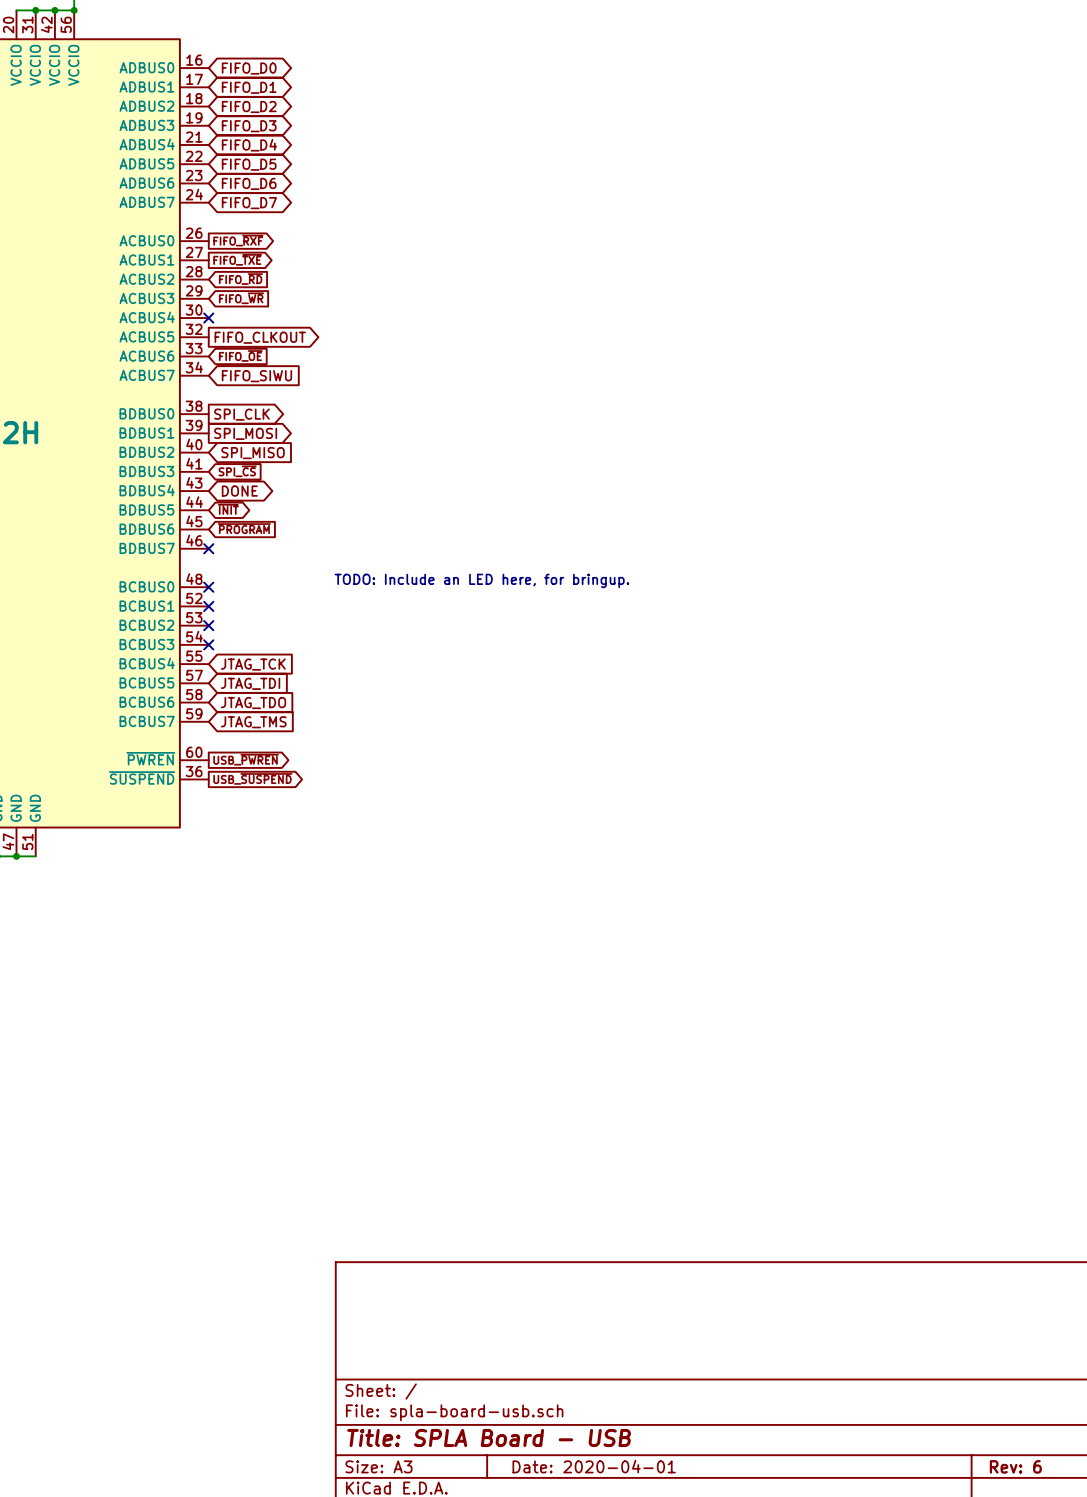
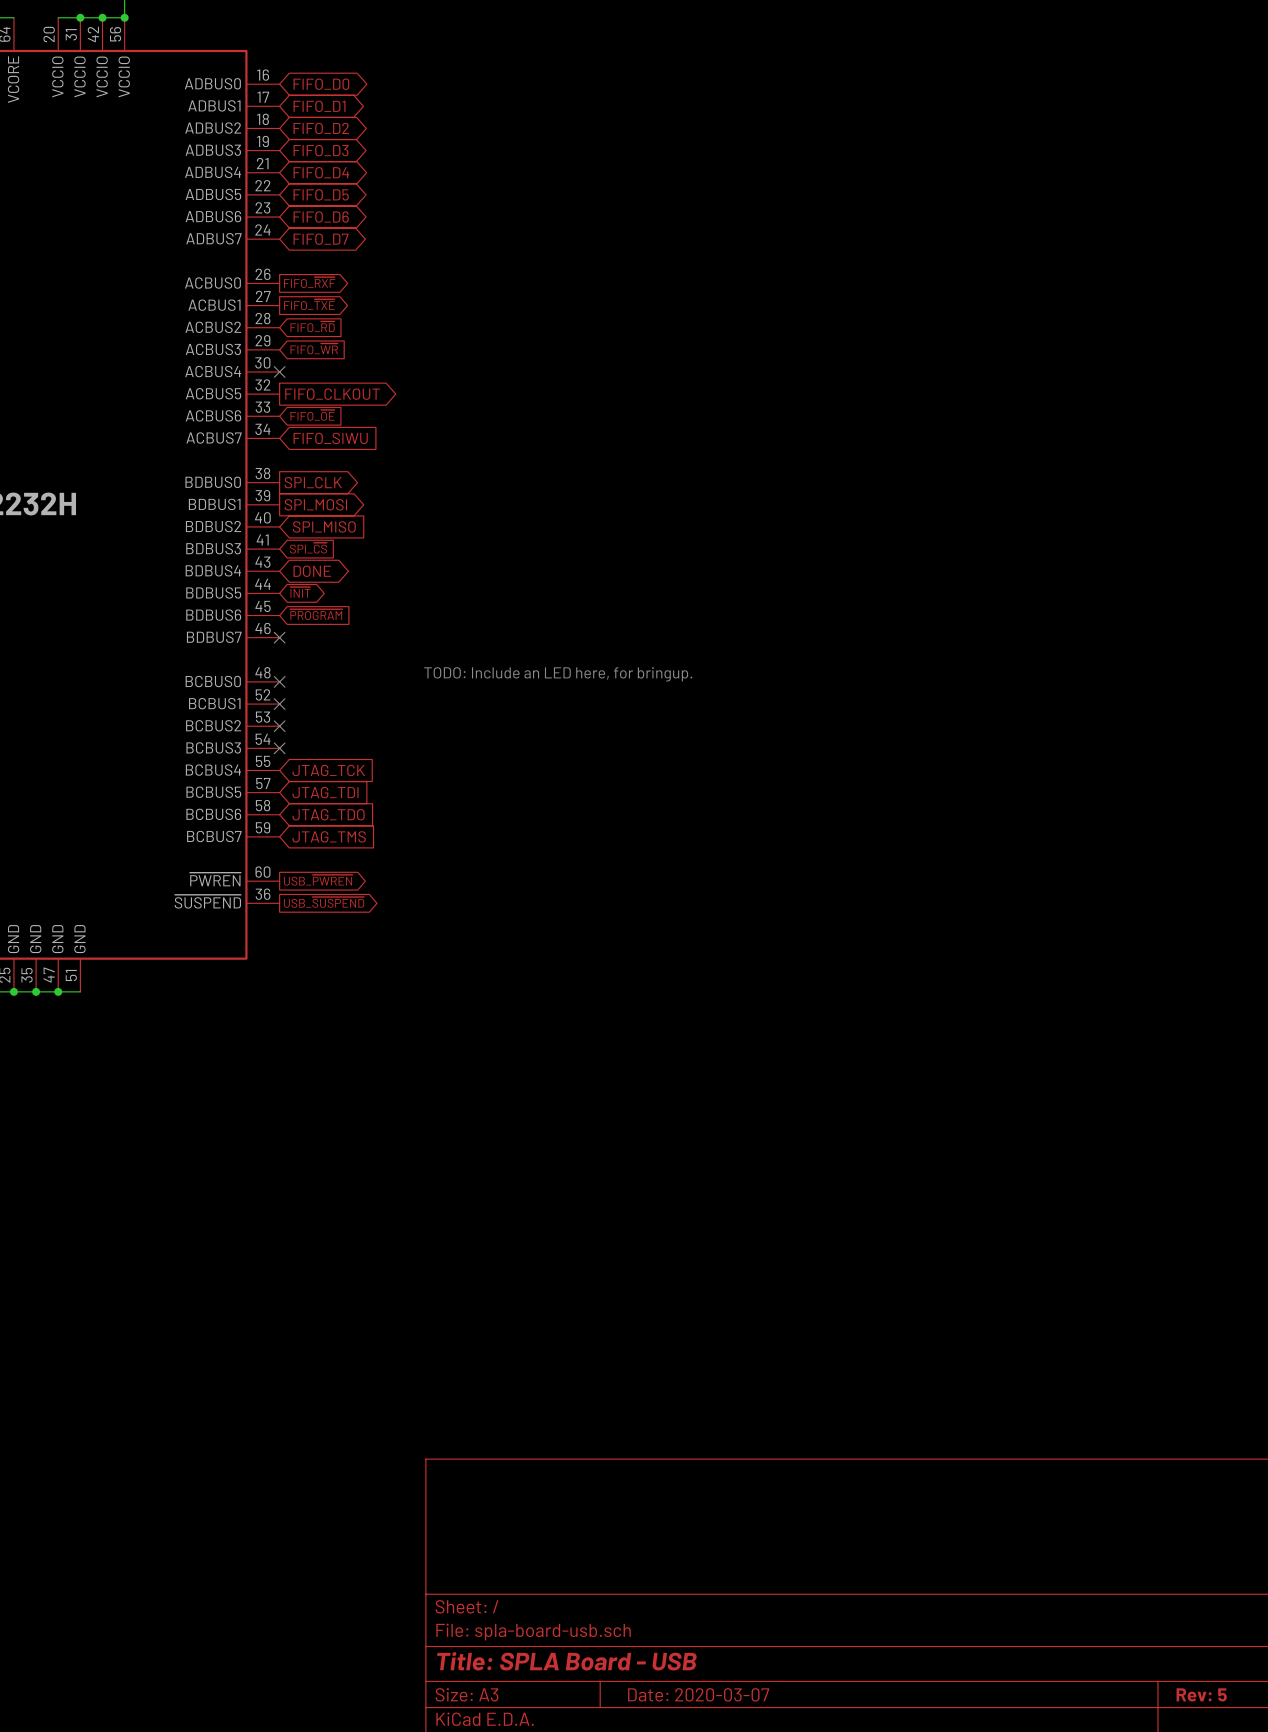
title block: Date: 2020-04-01 (594, 1466) -> Date: 2020-03-07 (698, 1694)
title block: Rev: 6 (1015, 1466) -> Rev: 5 (1201, 1694)

